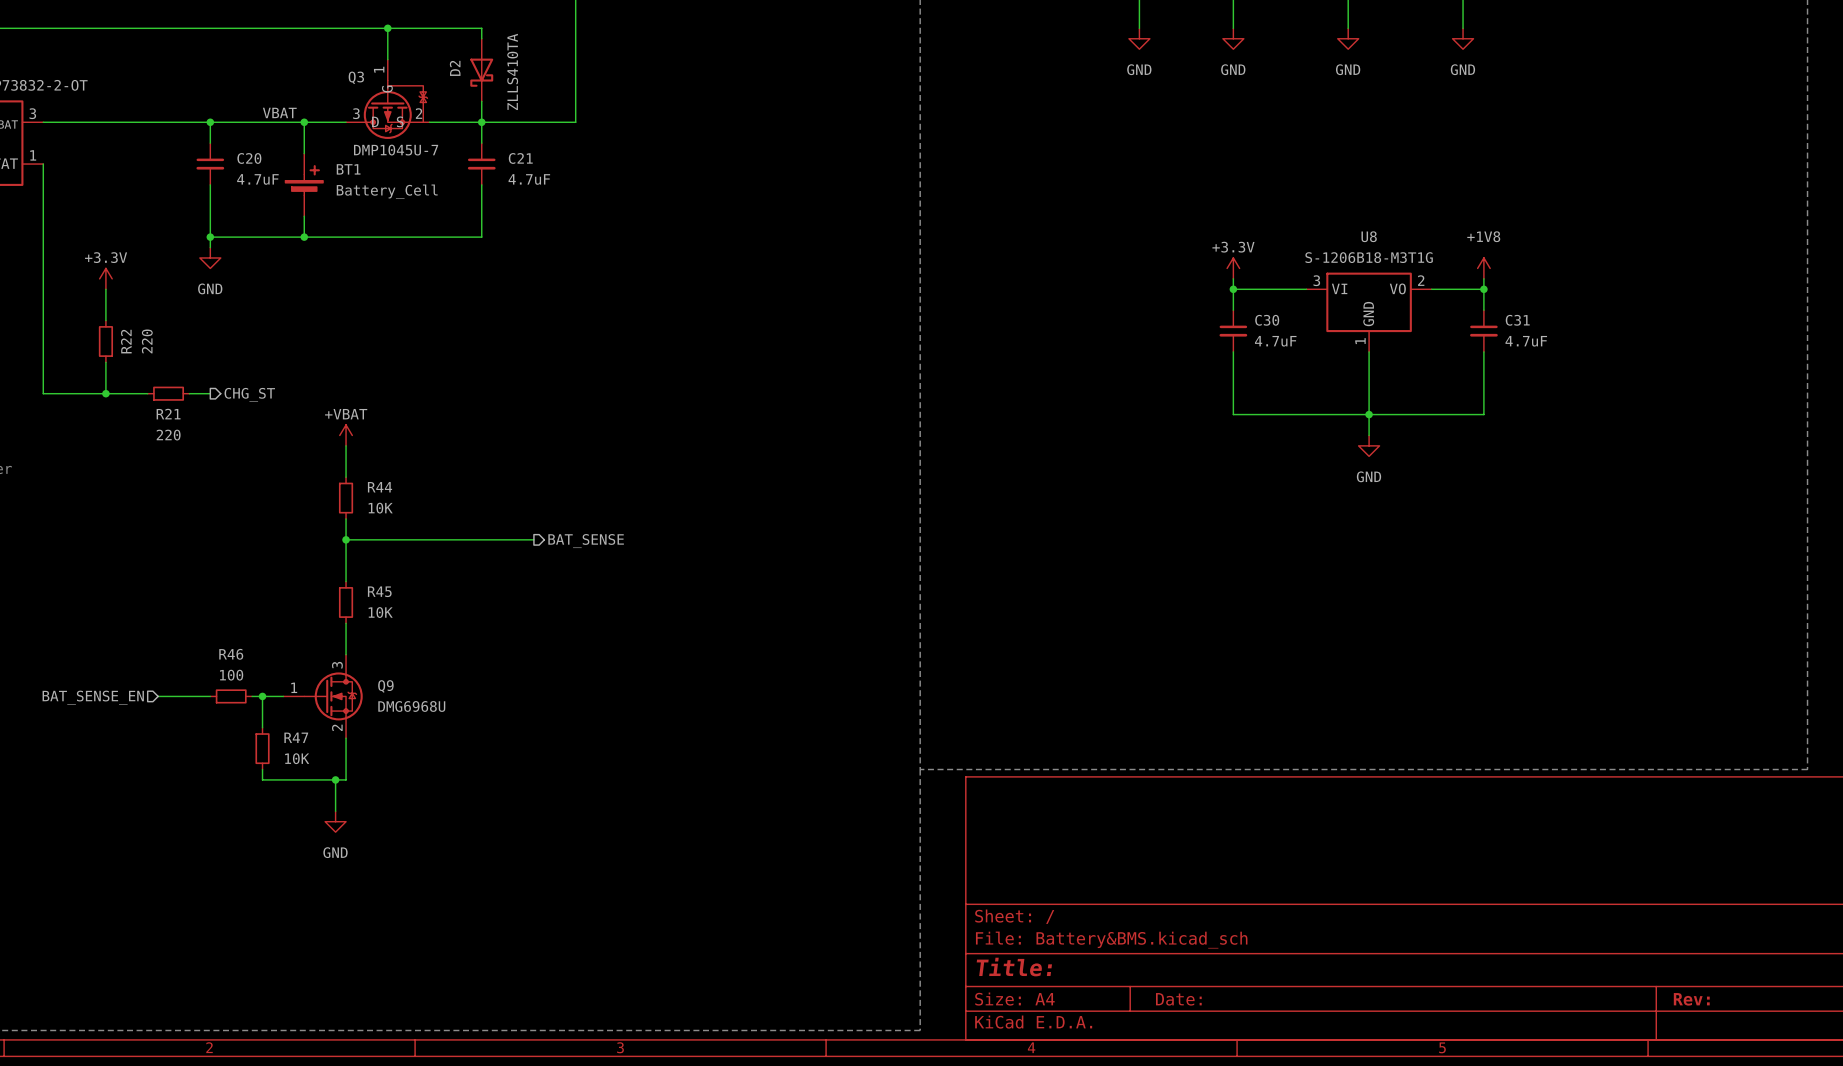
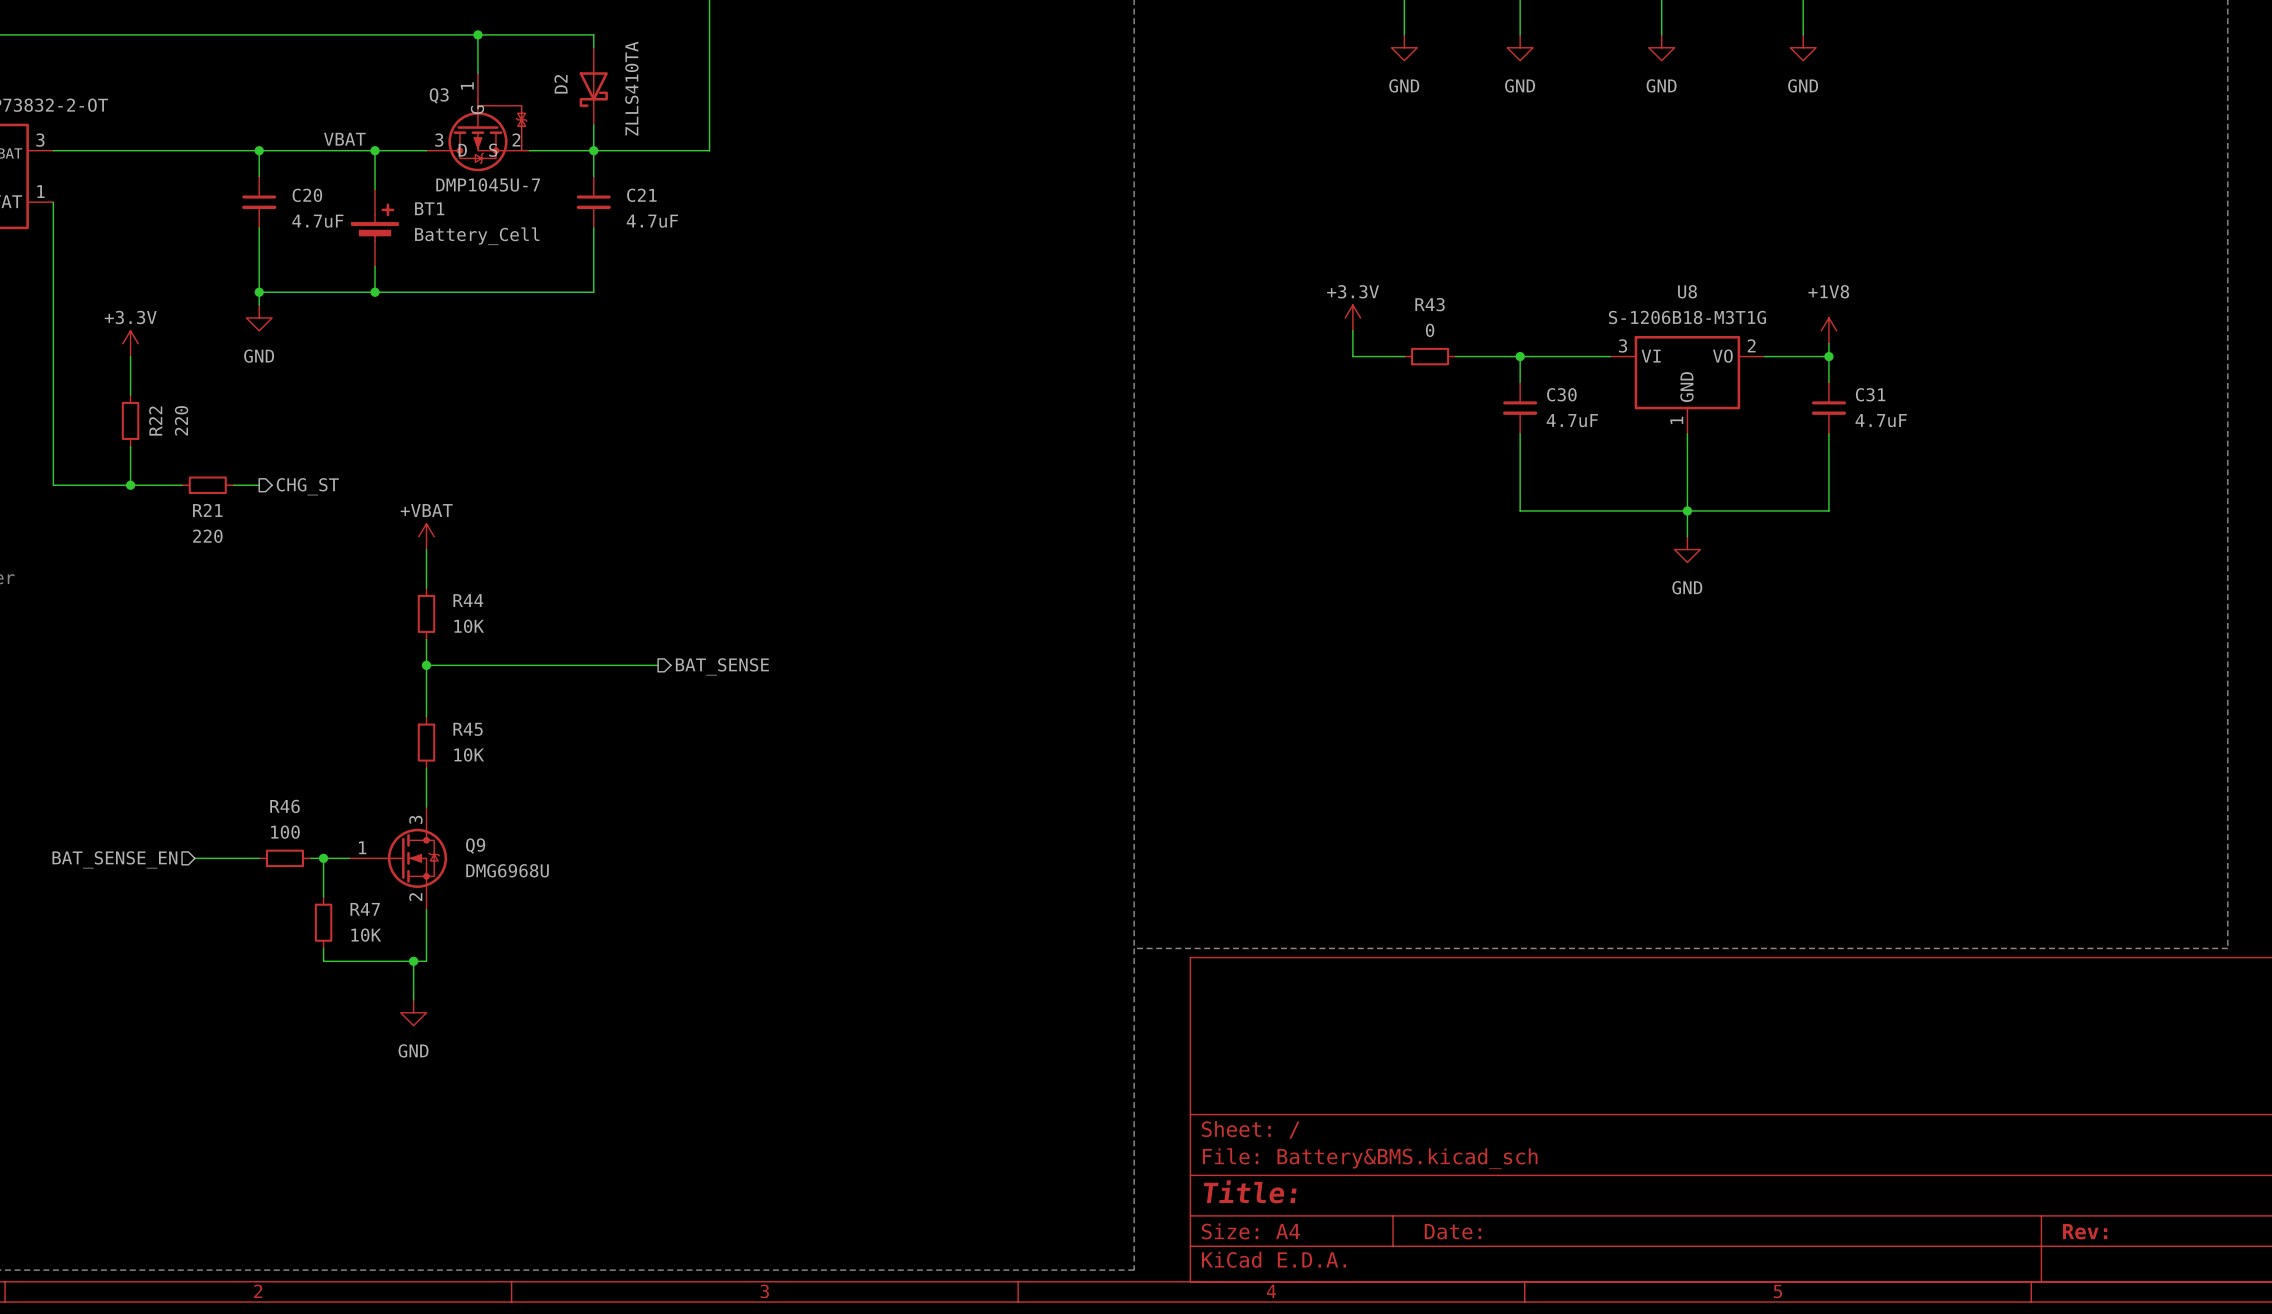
wire: none -> (1352, 330) (1352, 356) (1404, 356)
power symbol position: +3.3V (1233, 268) -> +3.3V (1352, 317)
wire: (1233, 278) (1233, 289) -> (1455, 356) (1520, 356)
R43: none -> 0 (1430, 356)

